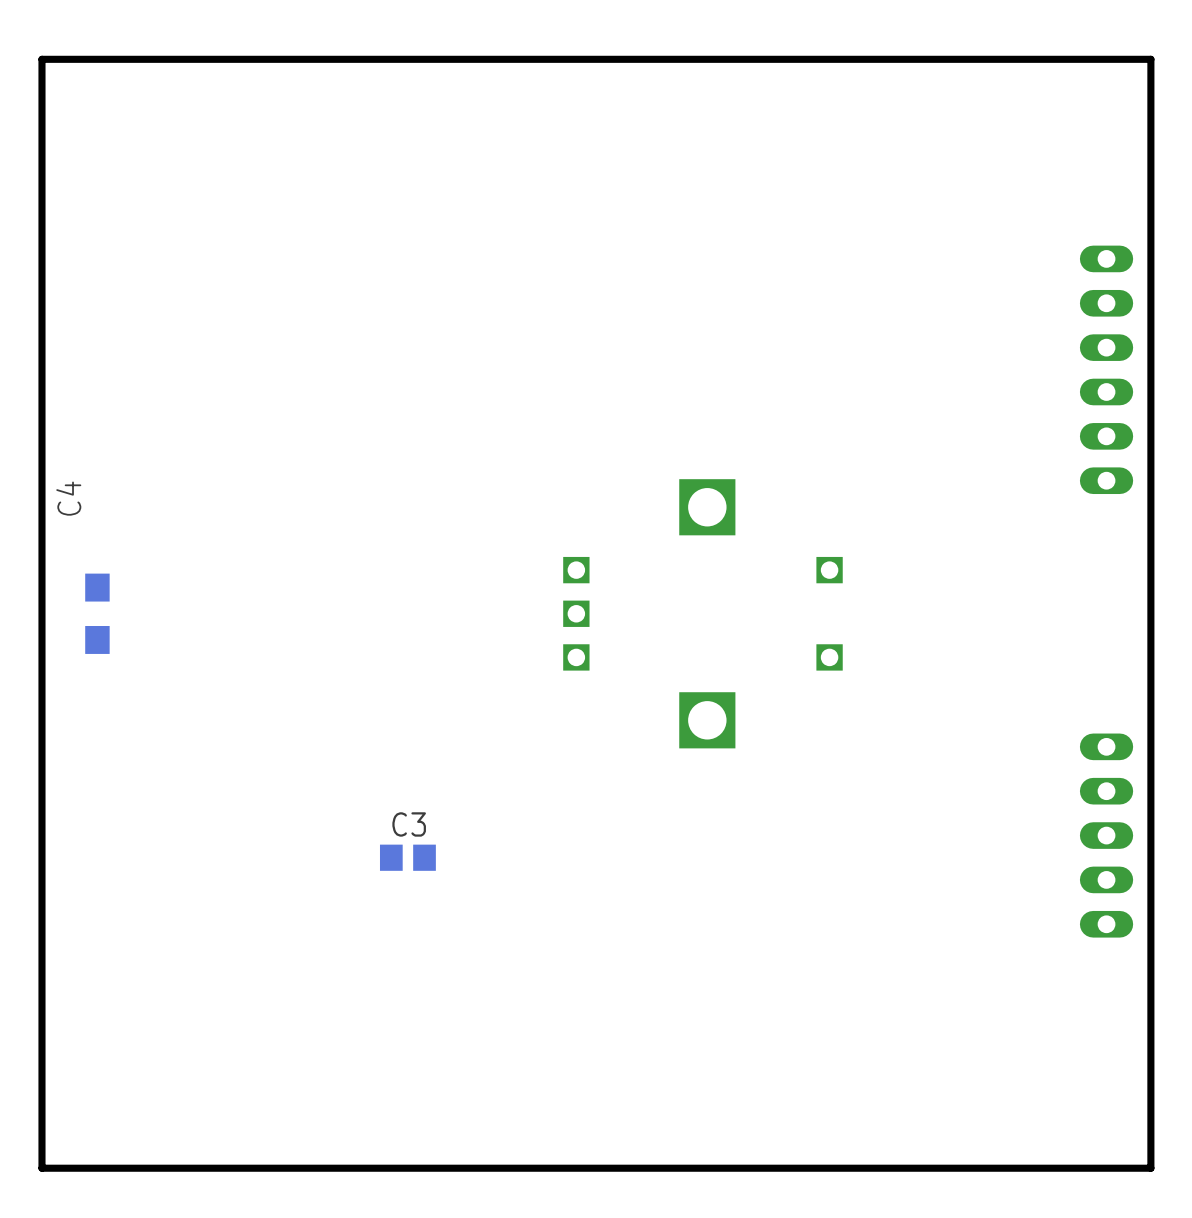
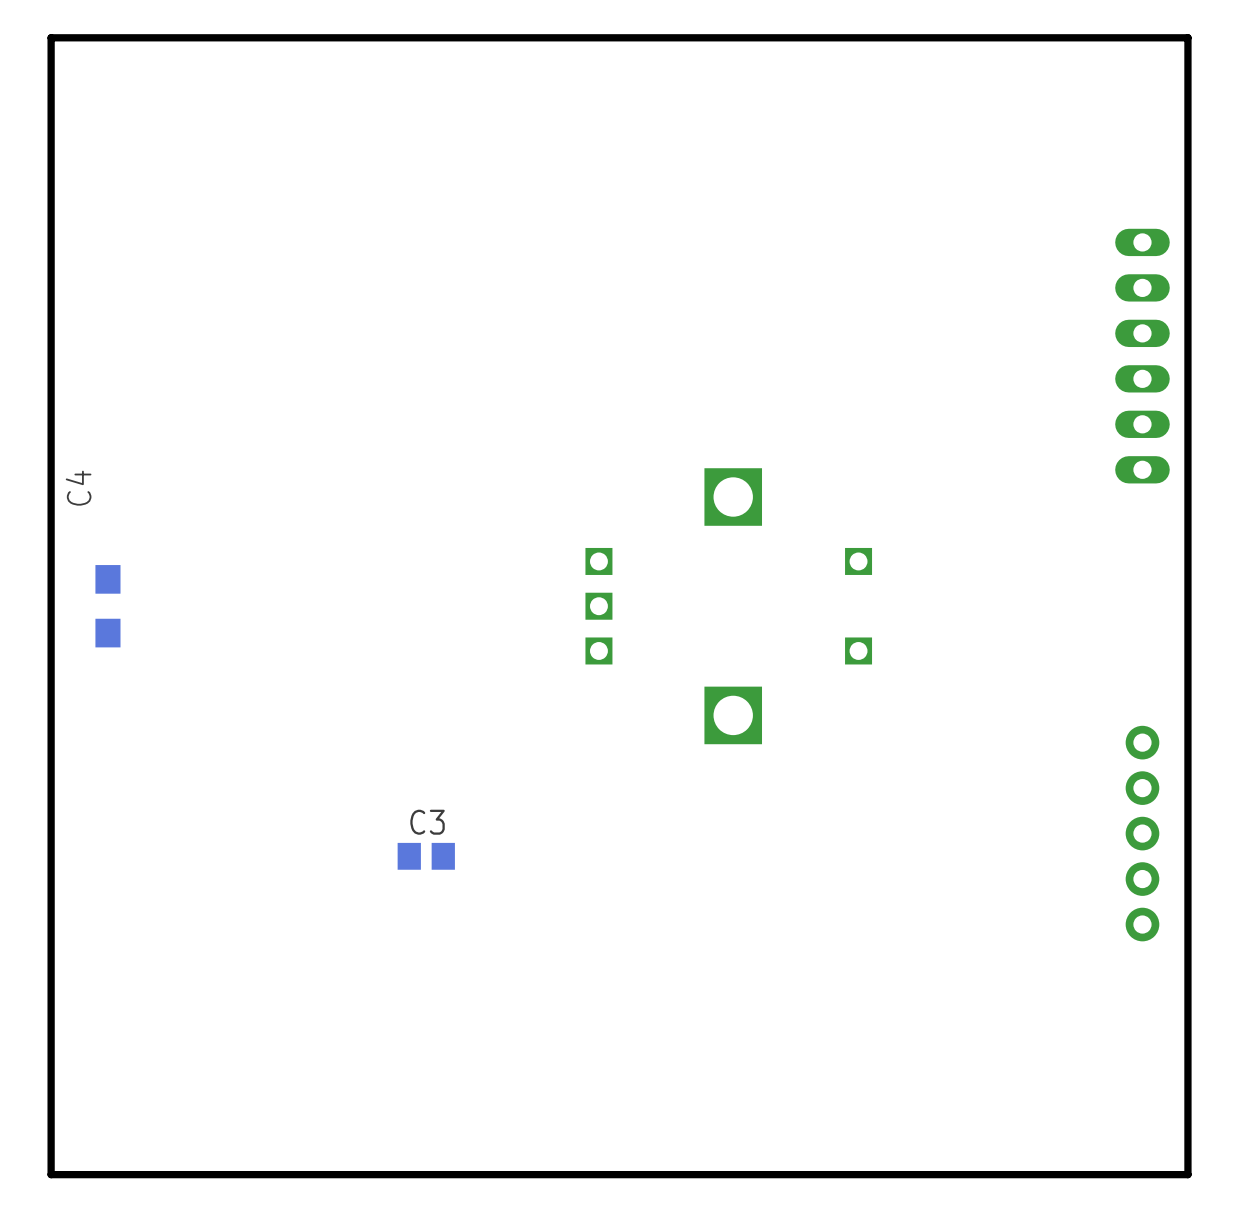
part footprint: [1079, 733, 1134, 938] -> [1125, 725, 1160, 942]

